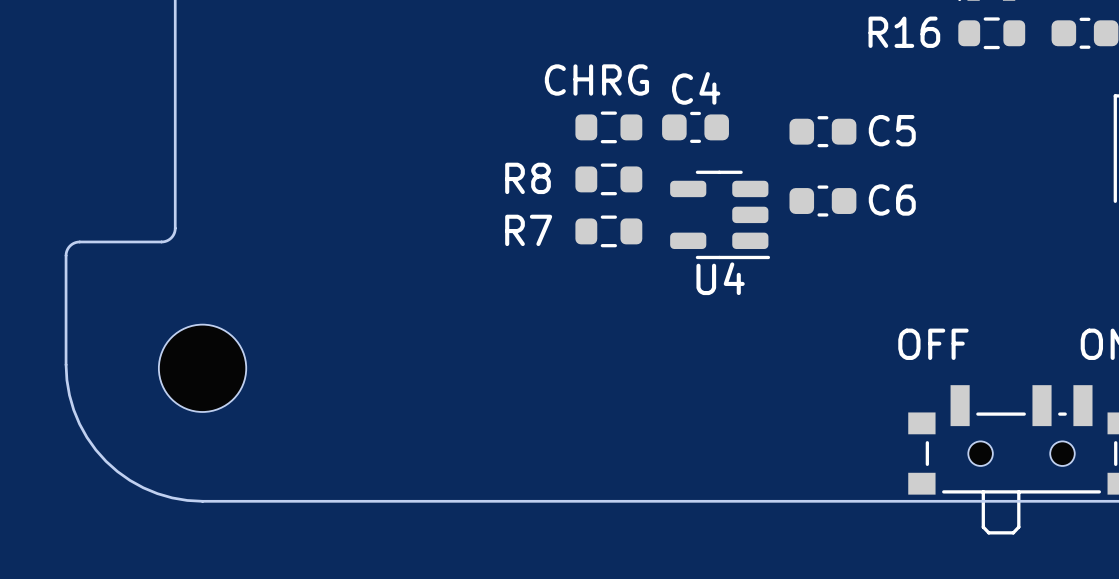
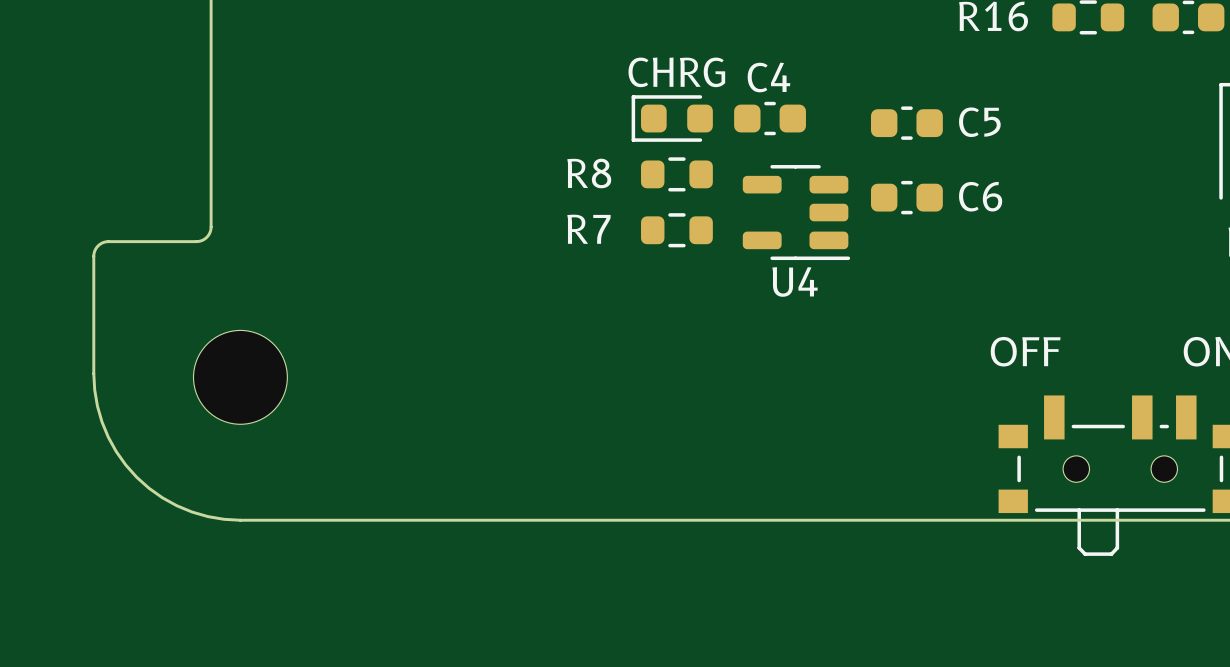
text: CHRG (596, 80) -> none
part footprint: [575, 111, 643, 144] -> [631, 95, 713, 142]

